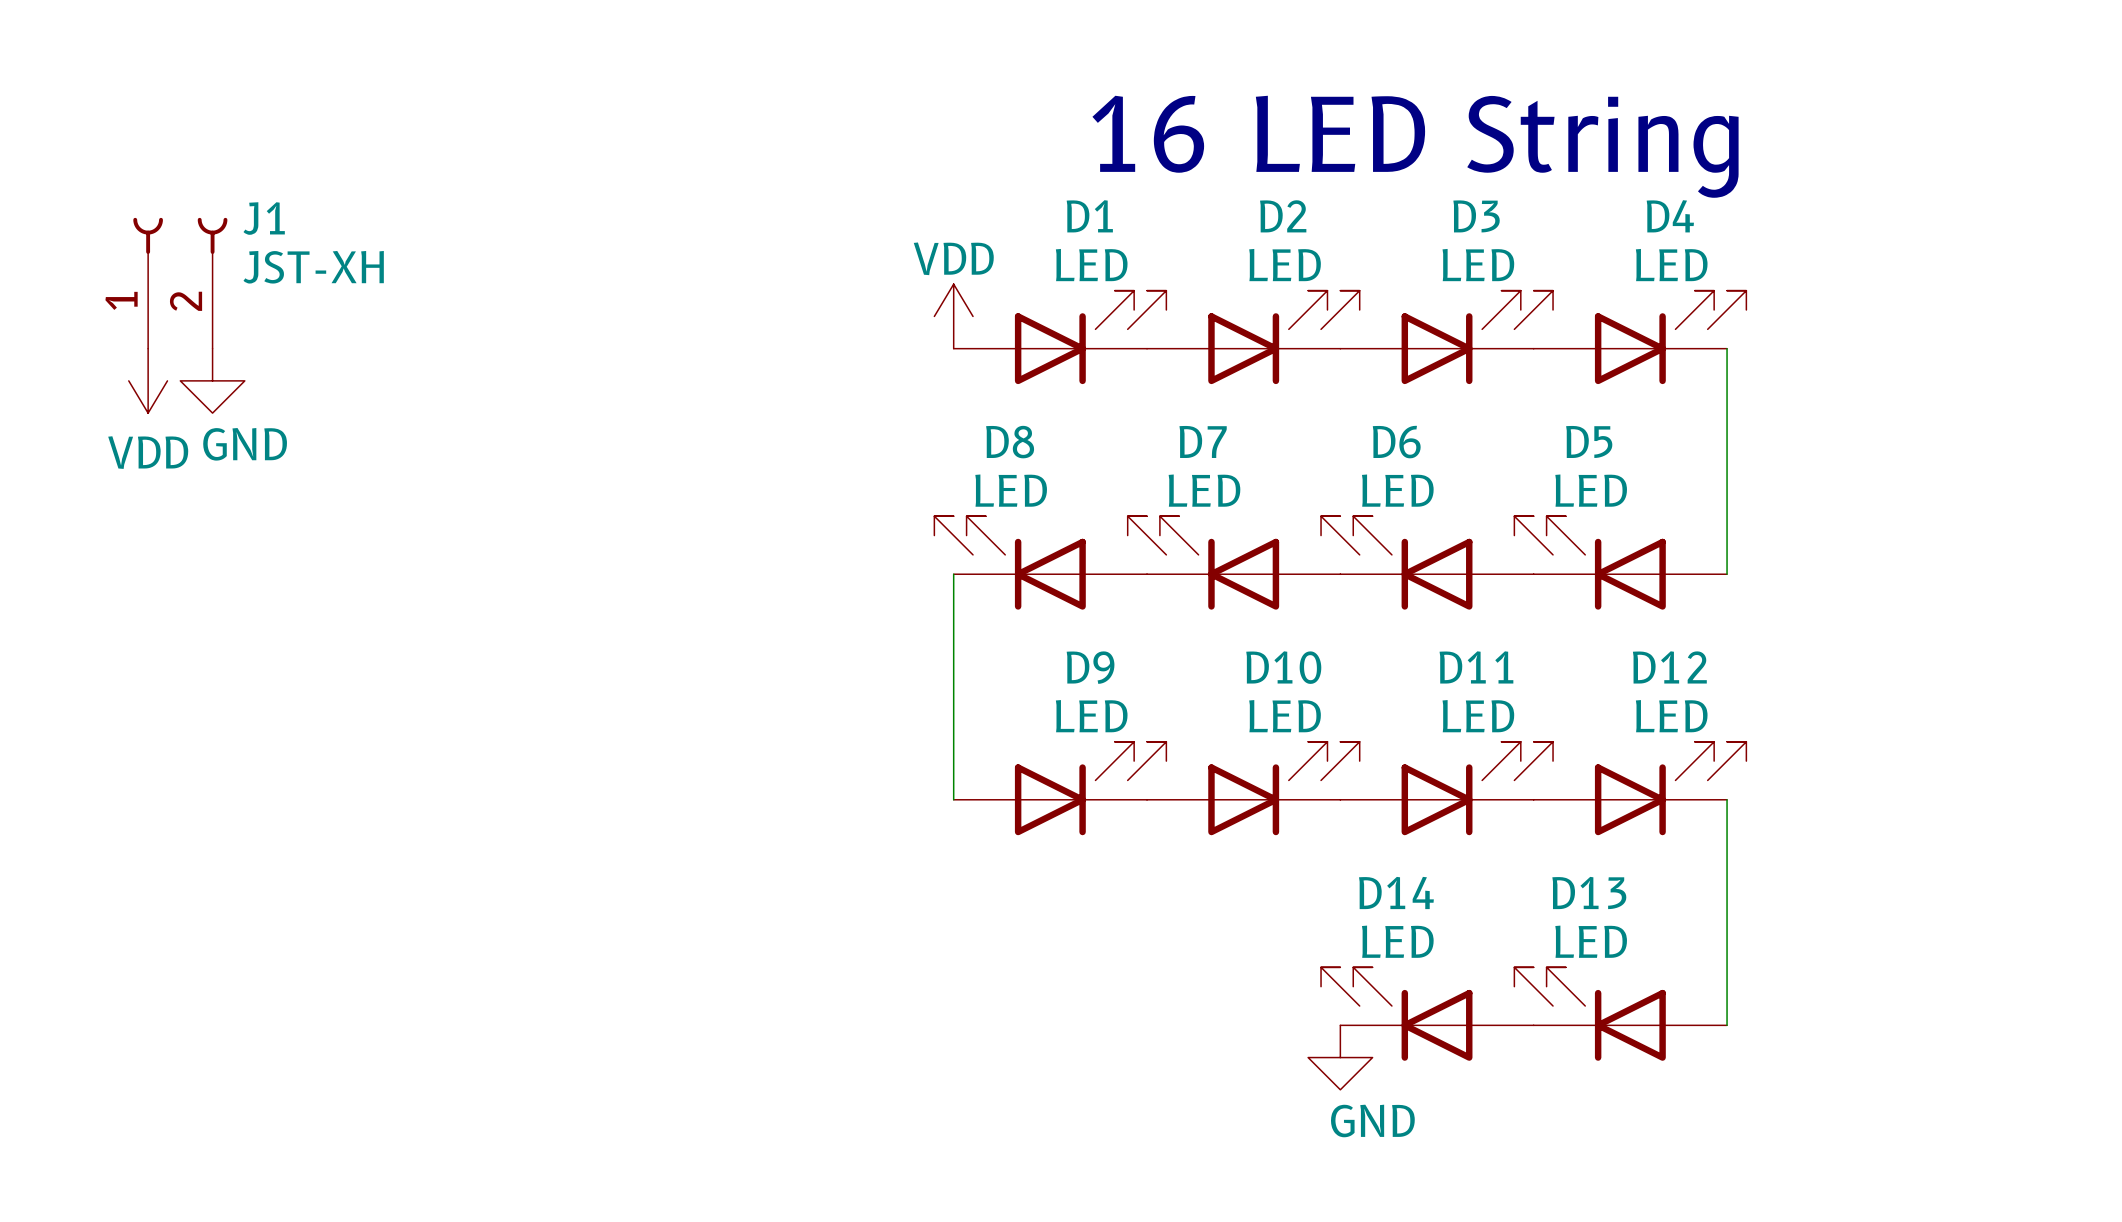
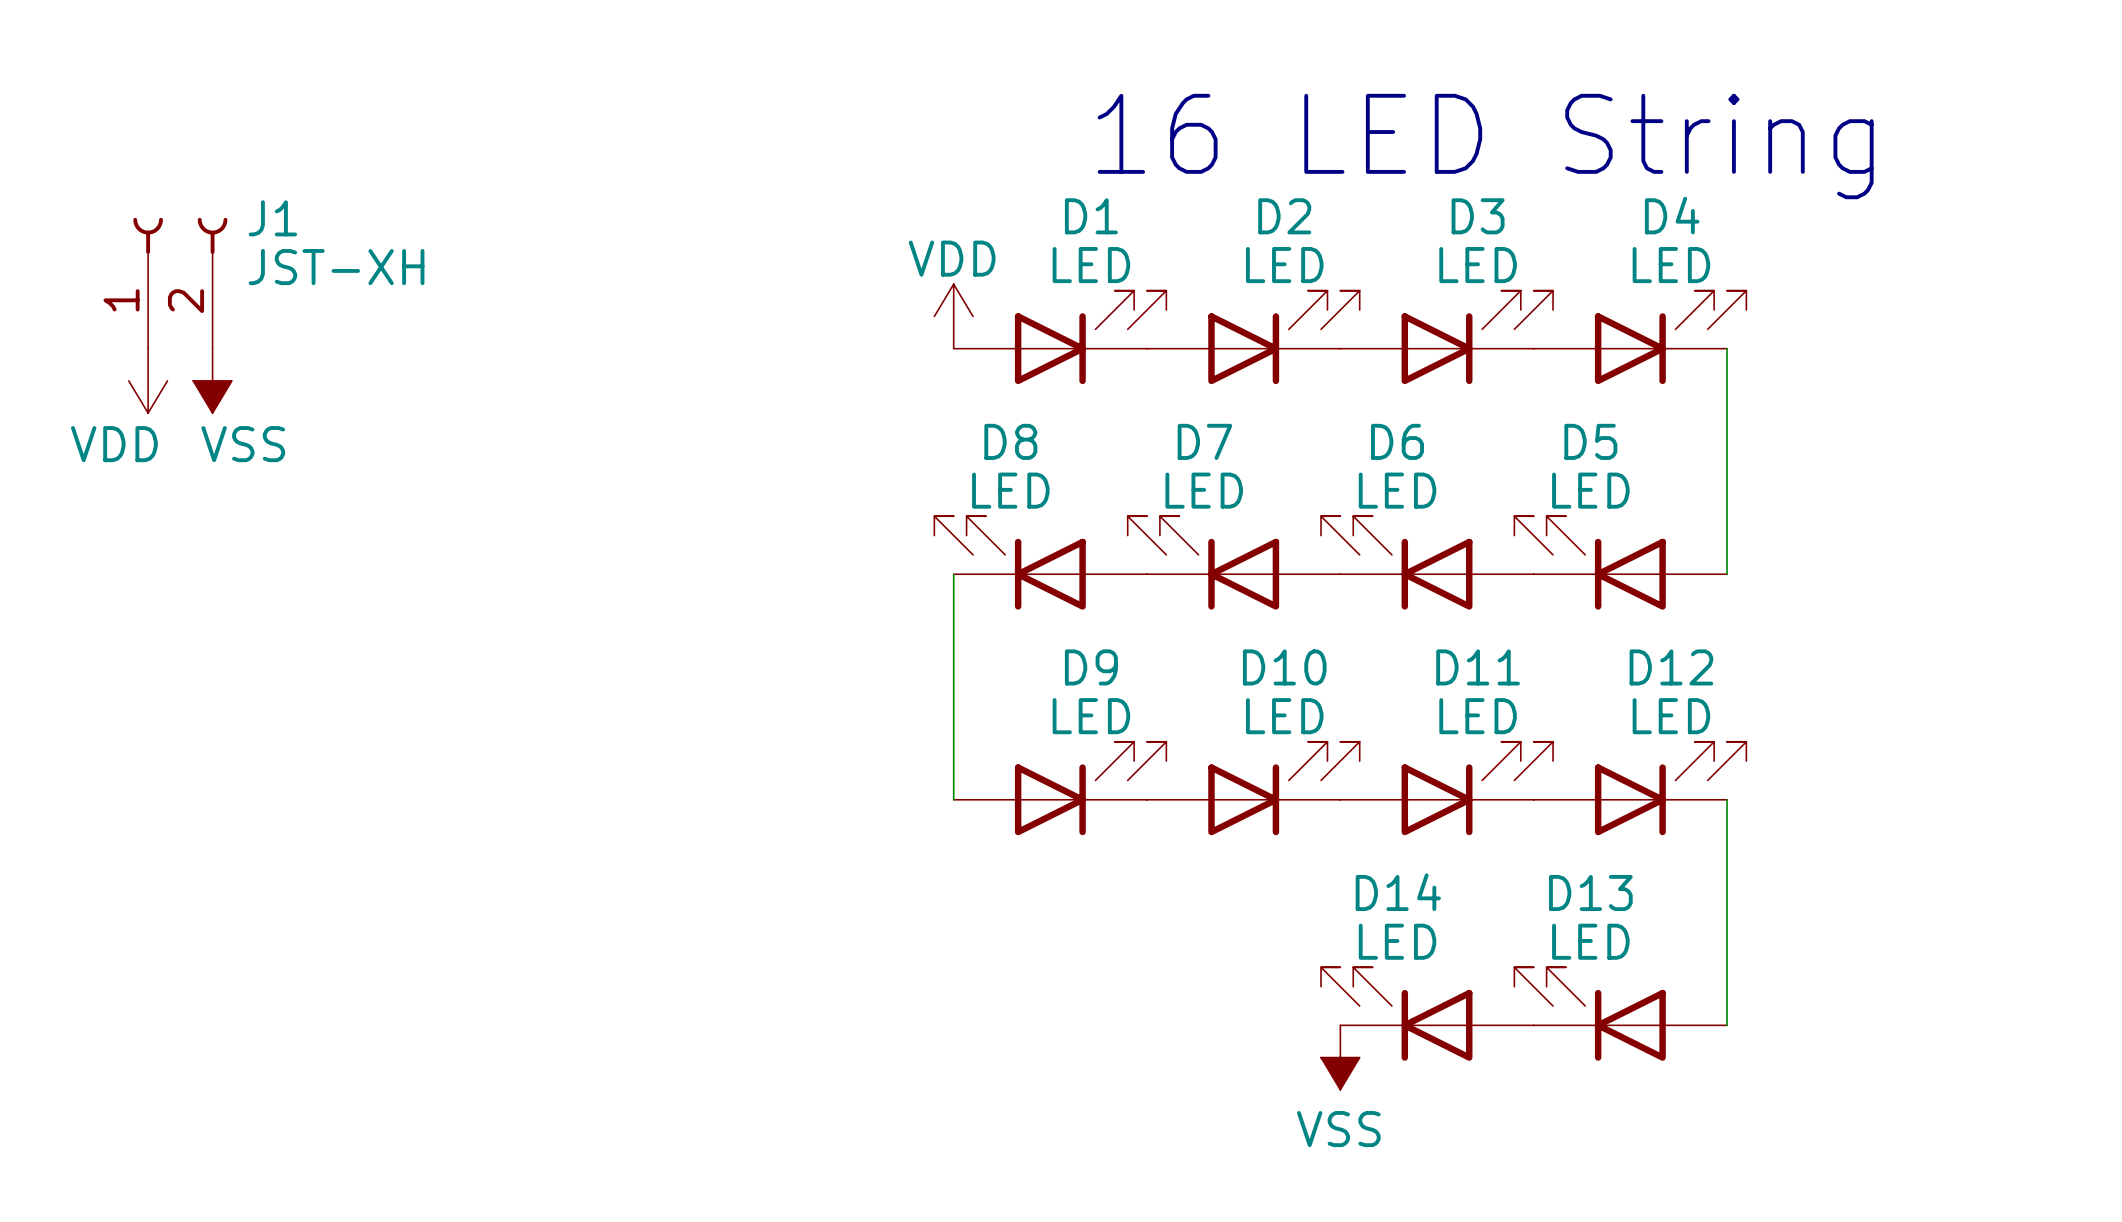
power symbol: GND (212, 380) -> VSS (212, 380)
power symbol text position: VDD (148, 452) -> VDD (114, 444)
power symbol: GND (1340, 1057) -> VSS (1340, 1057)

